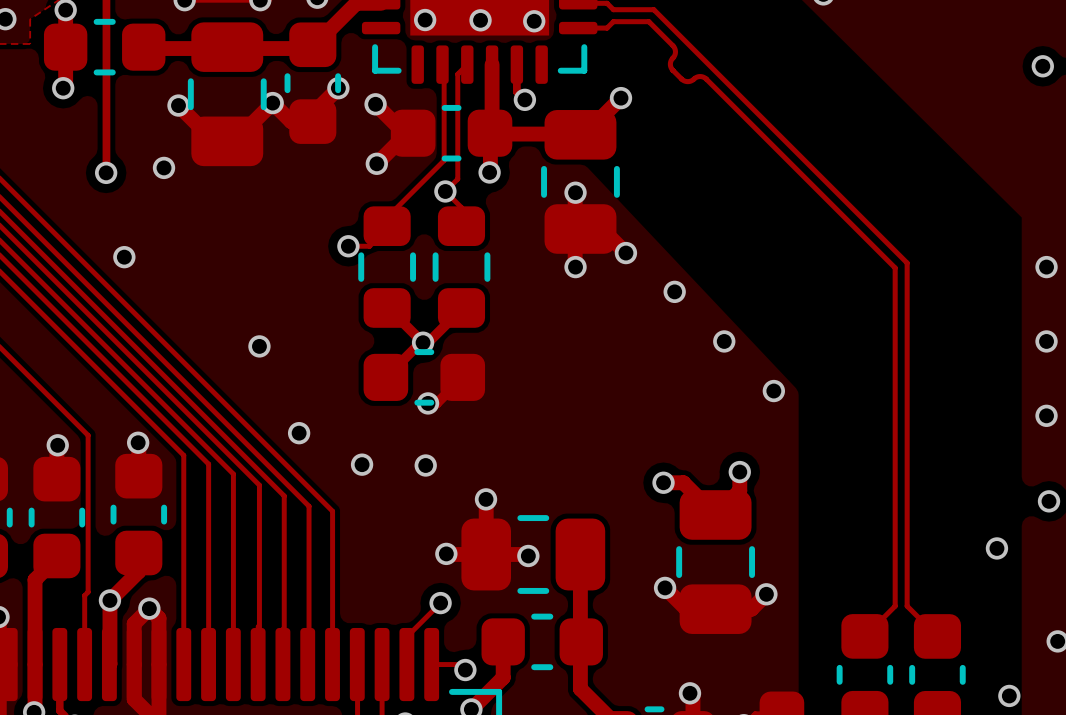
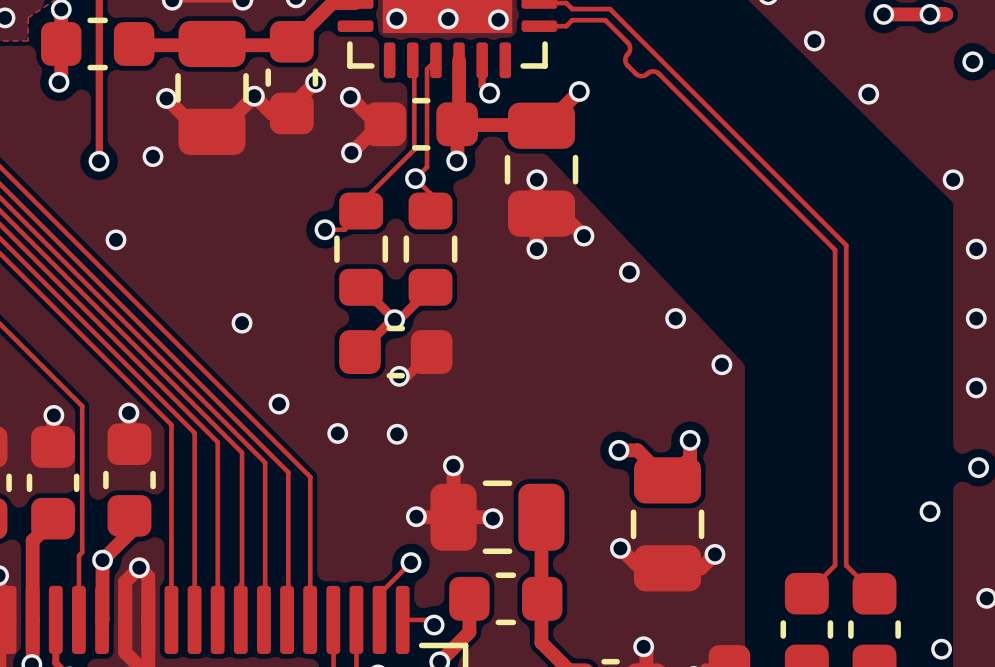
track: none -> (883, 14) (946, 14)
via: none -> (883, 14)
via: none -> (930, 14)
via: none -> (814, 41)
via: none -> (868, 94)
via: none -> (953, 179)

